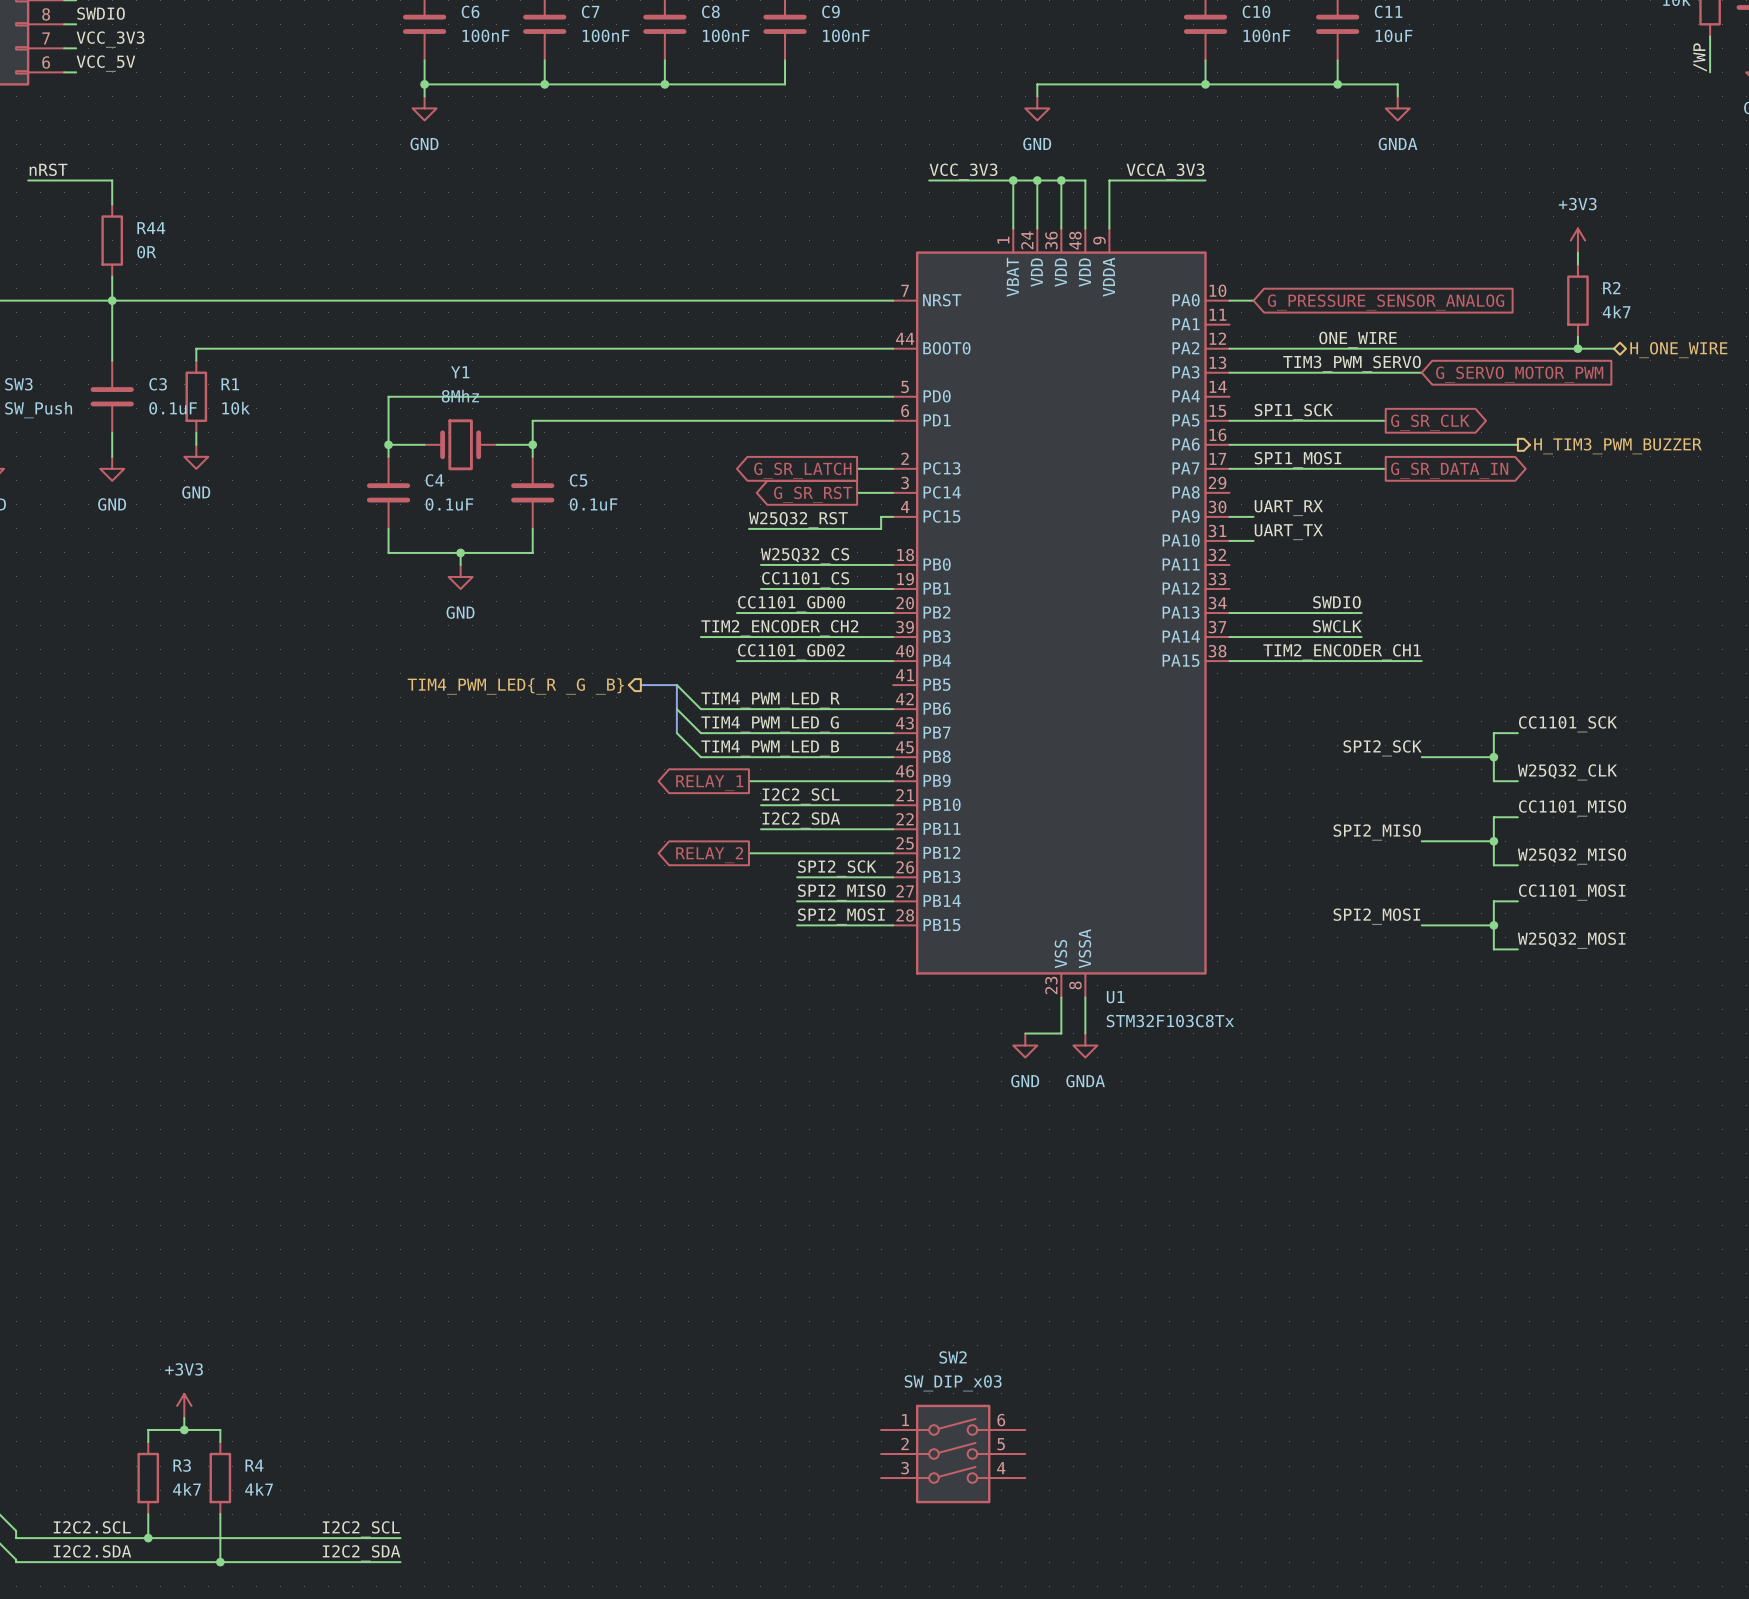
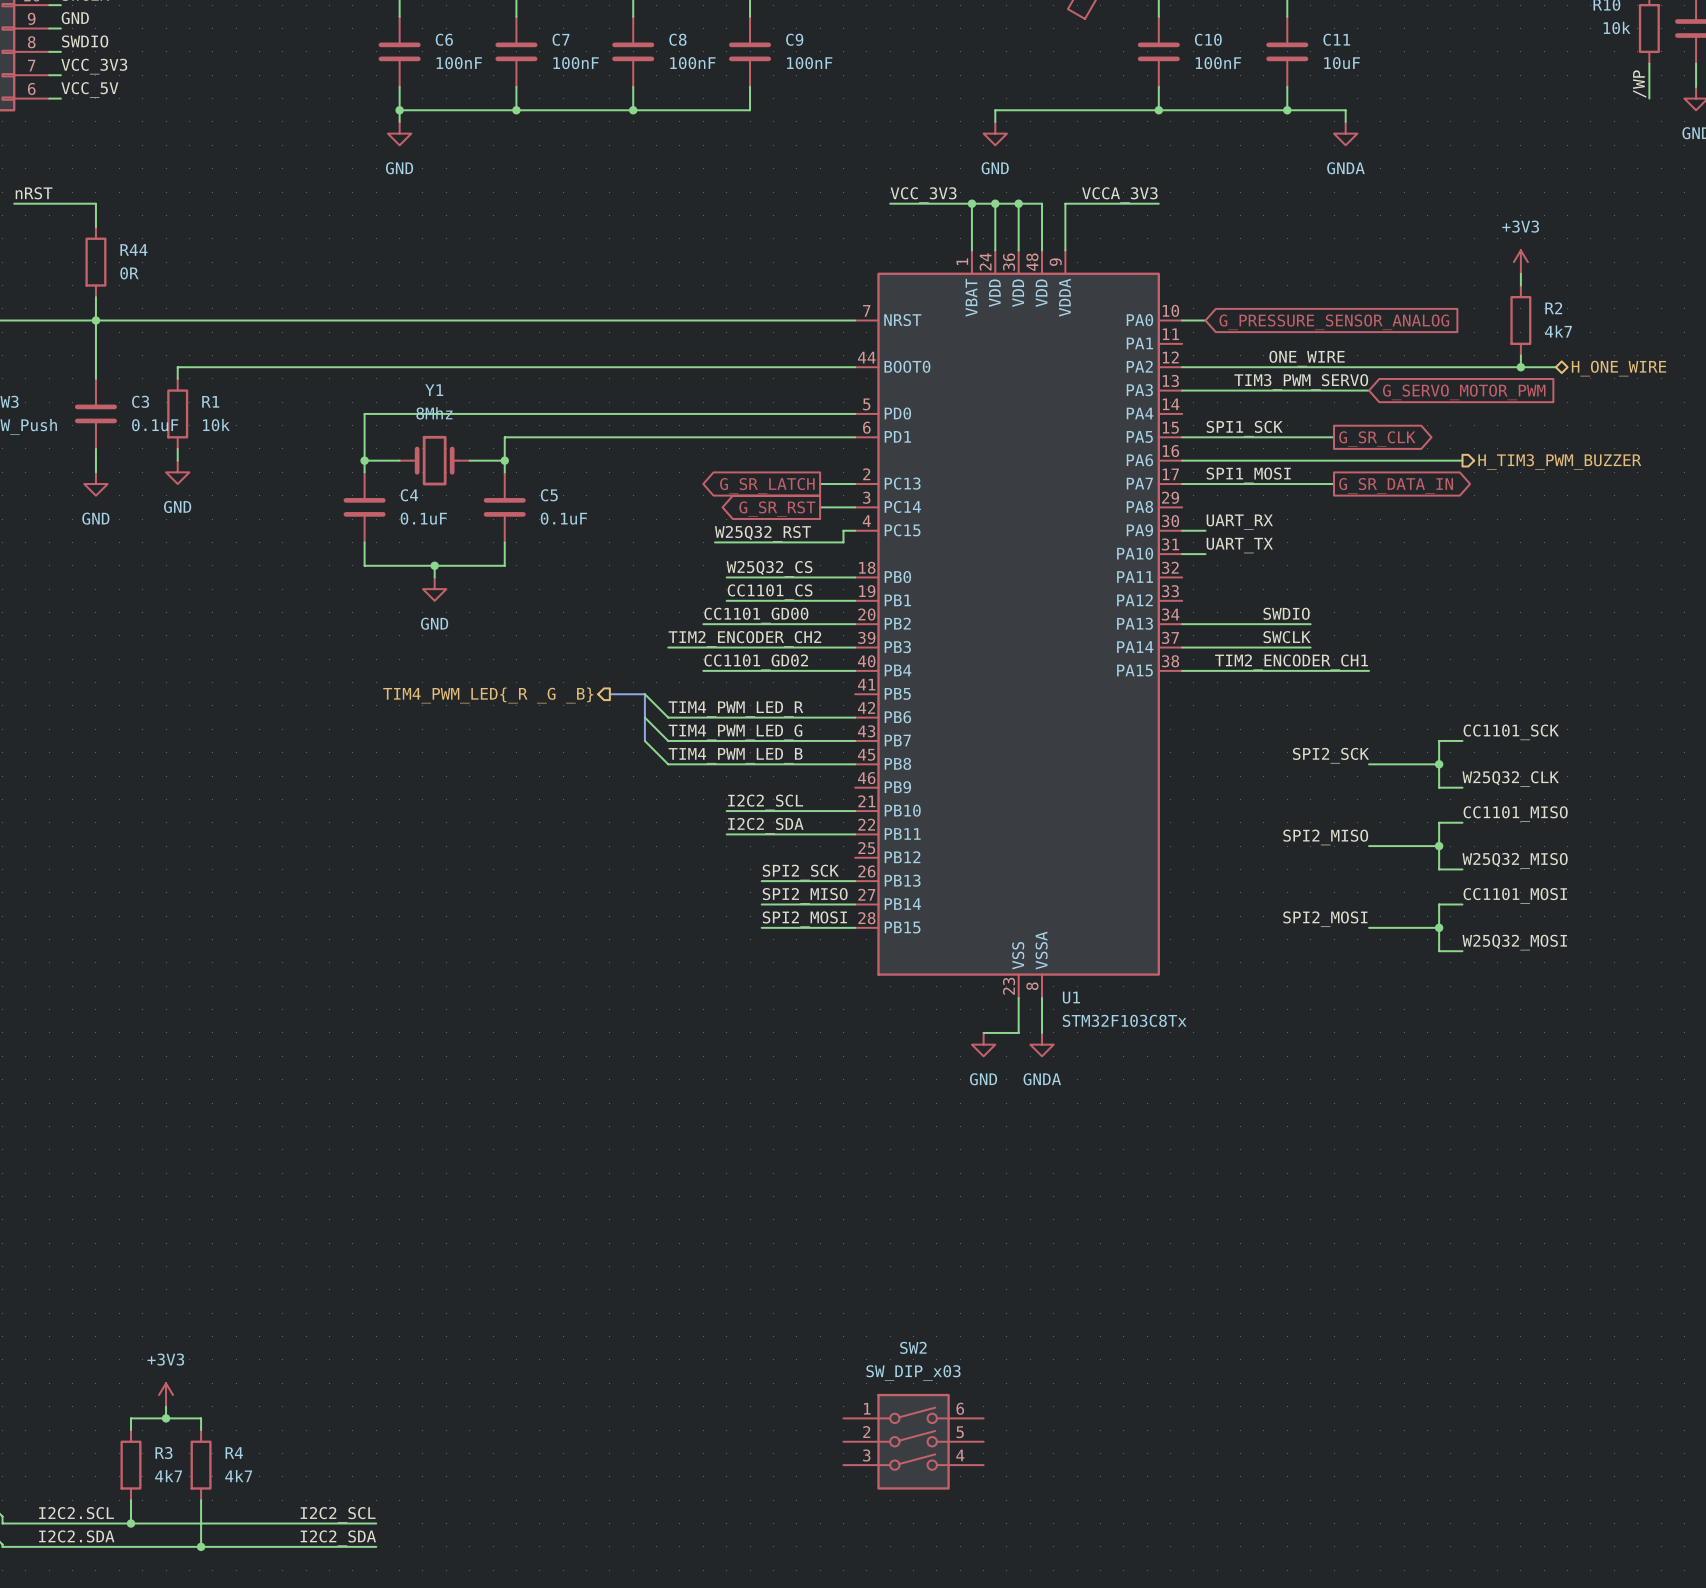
wire: (748, 781) (893, 781) -> none
global label: RELAY_1 (709, 783) -> none
wire: (748, 853) (893, 853) -> none
global label: RELAY_2 (709, 855) -> none

